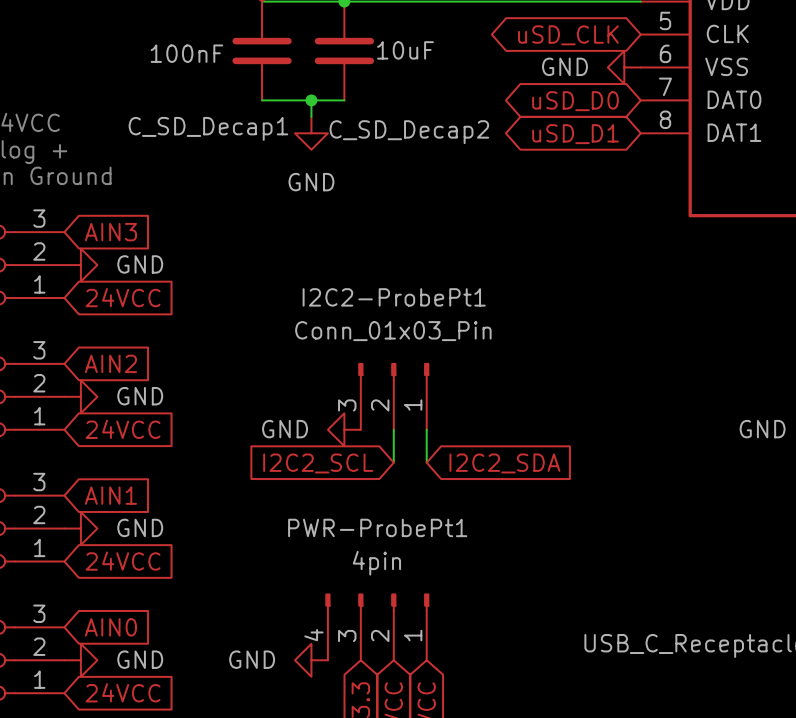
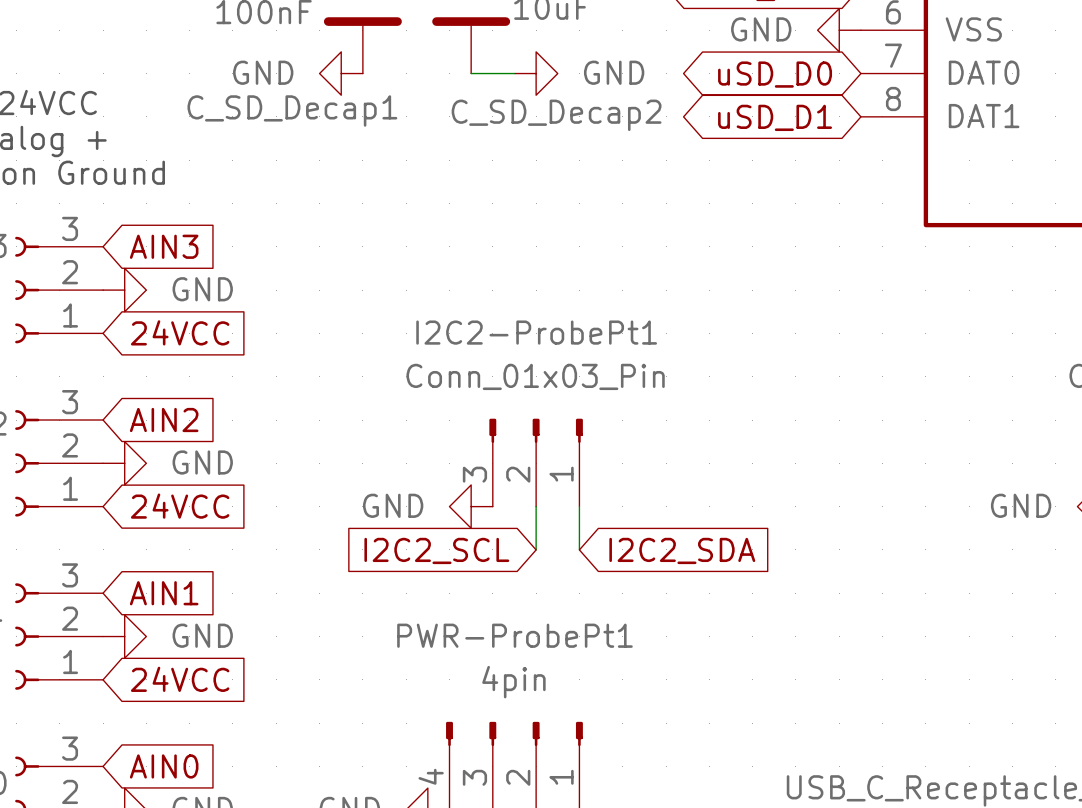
power symbol: none -> GND (341, 73)
wire: (262, 100) (344, 100) -> (514, 73) (471, 73)
wire: (311, 100) (311, 116) -> none
junction: (311, 100) -> none
power symbol: none -> GND (536, 73)
power symbol: GND (311, 133) -> none

